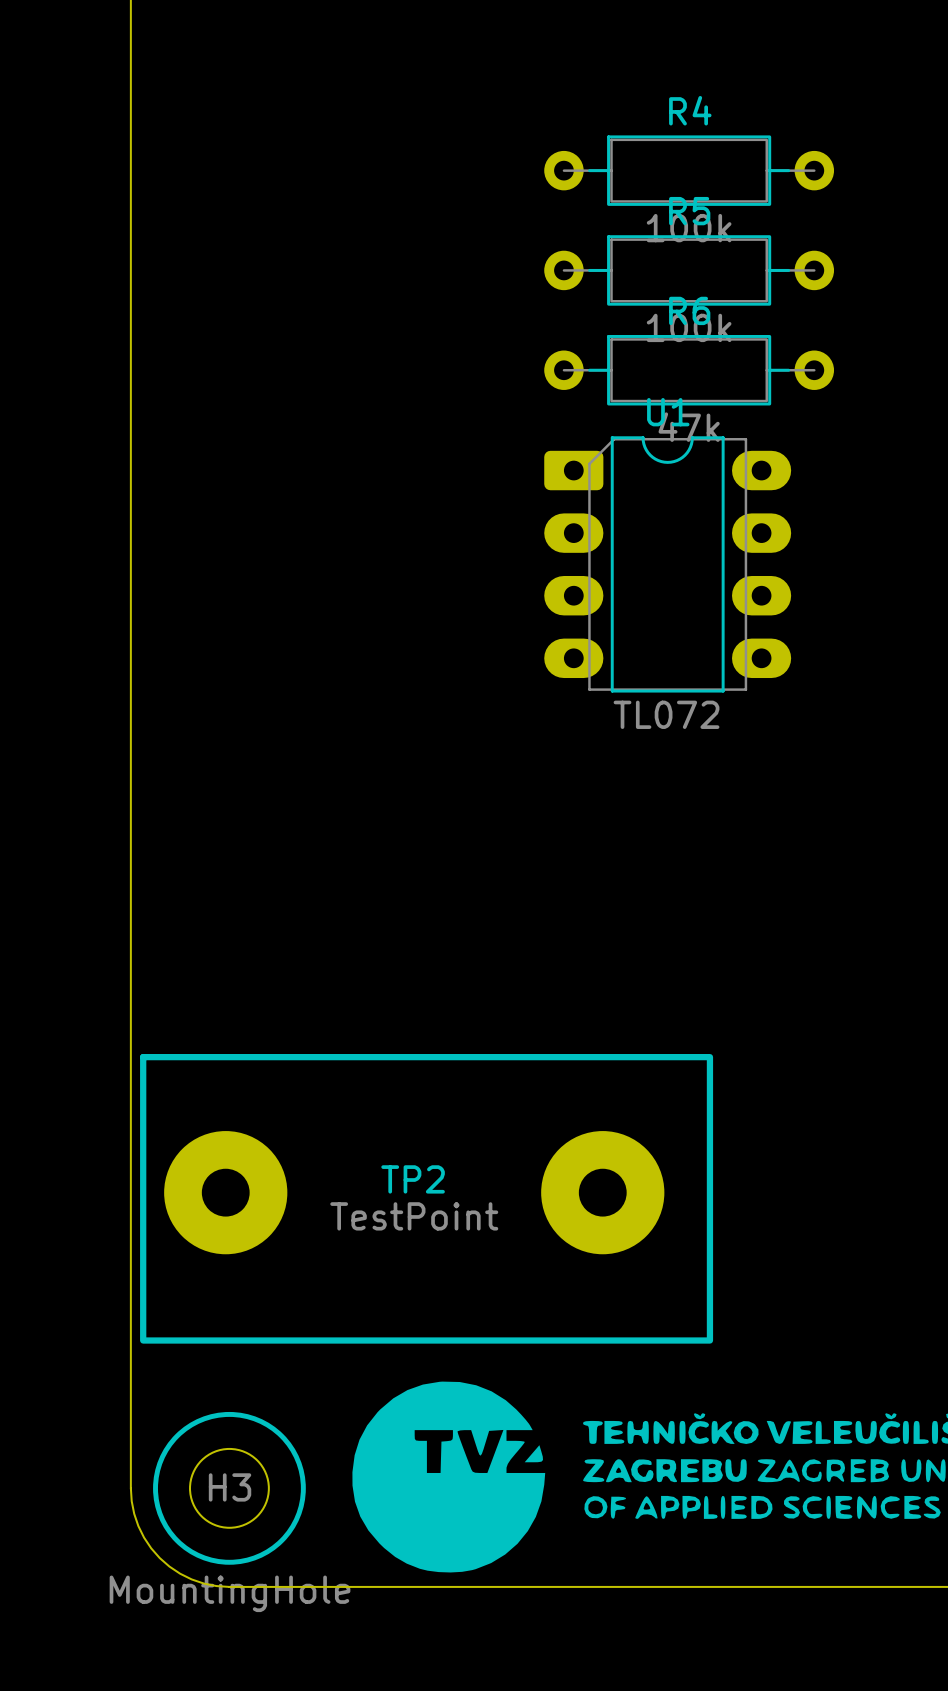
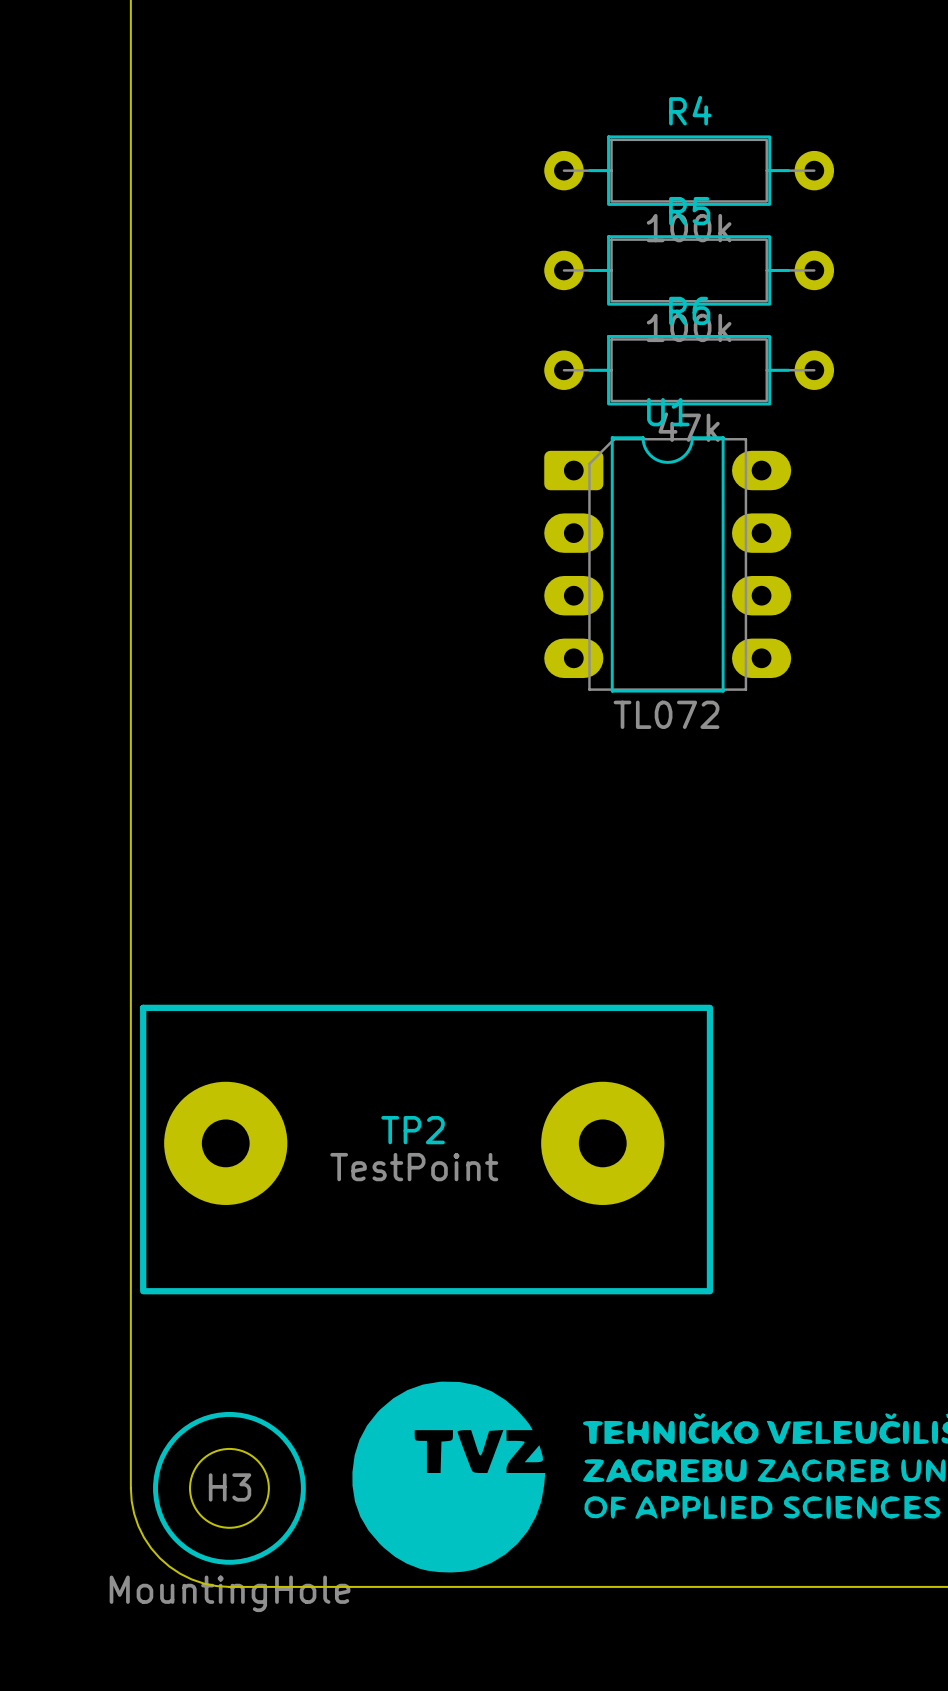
TP2 position: (426, 1198) -> (426, 1149)

